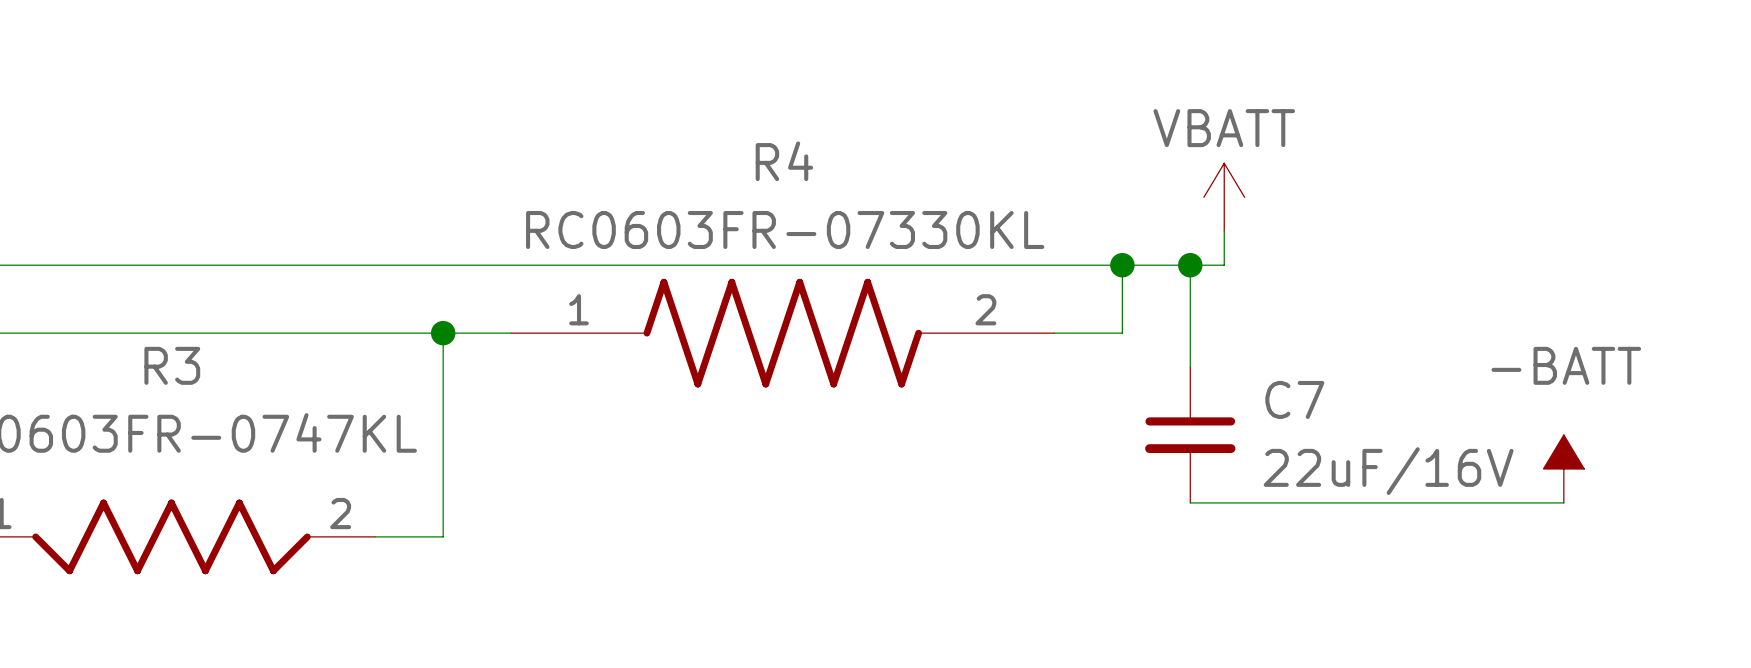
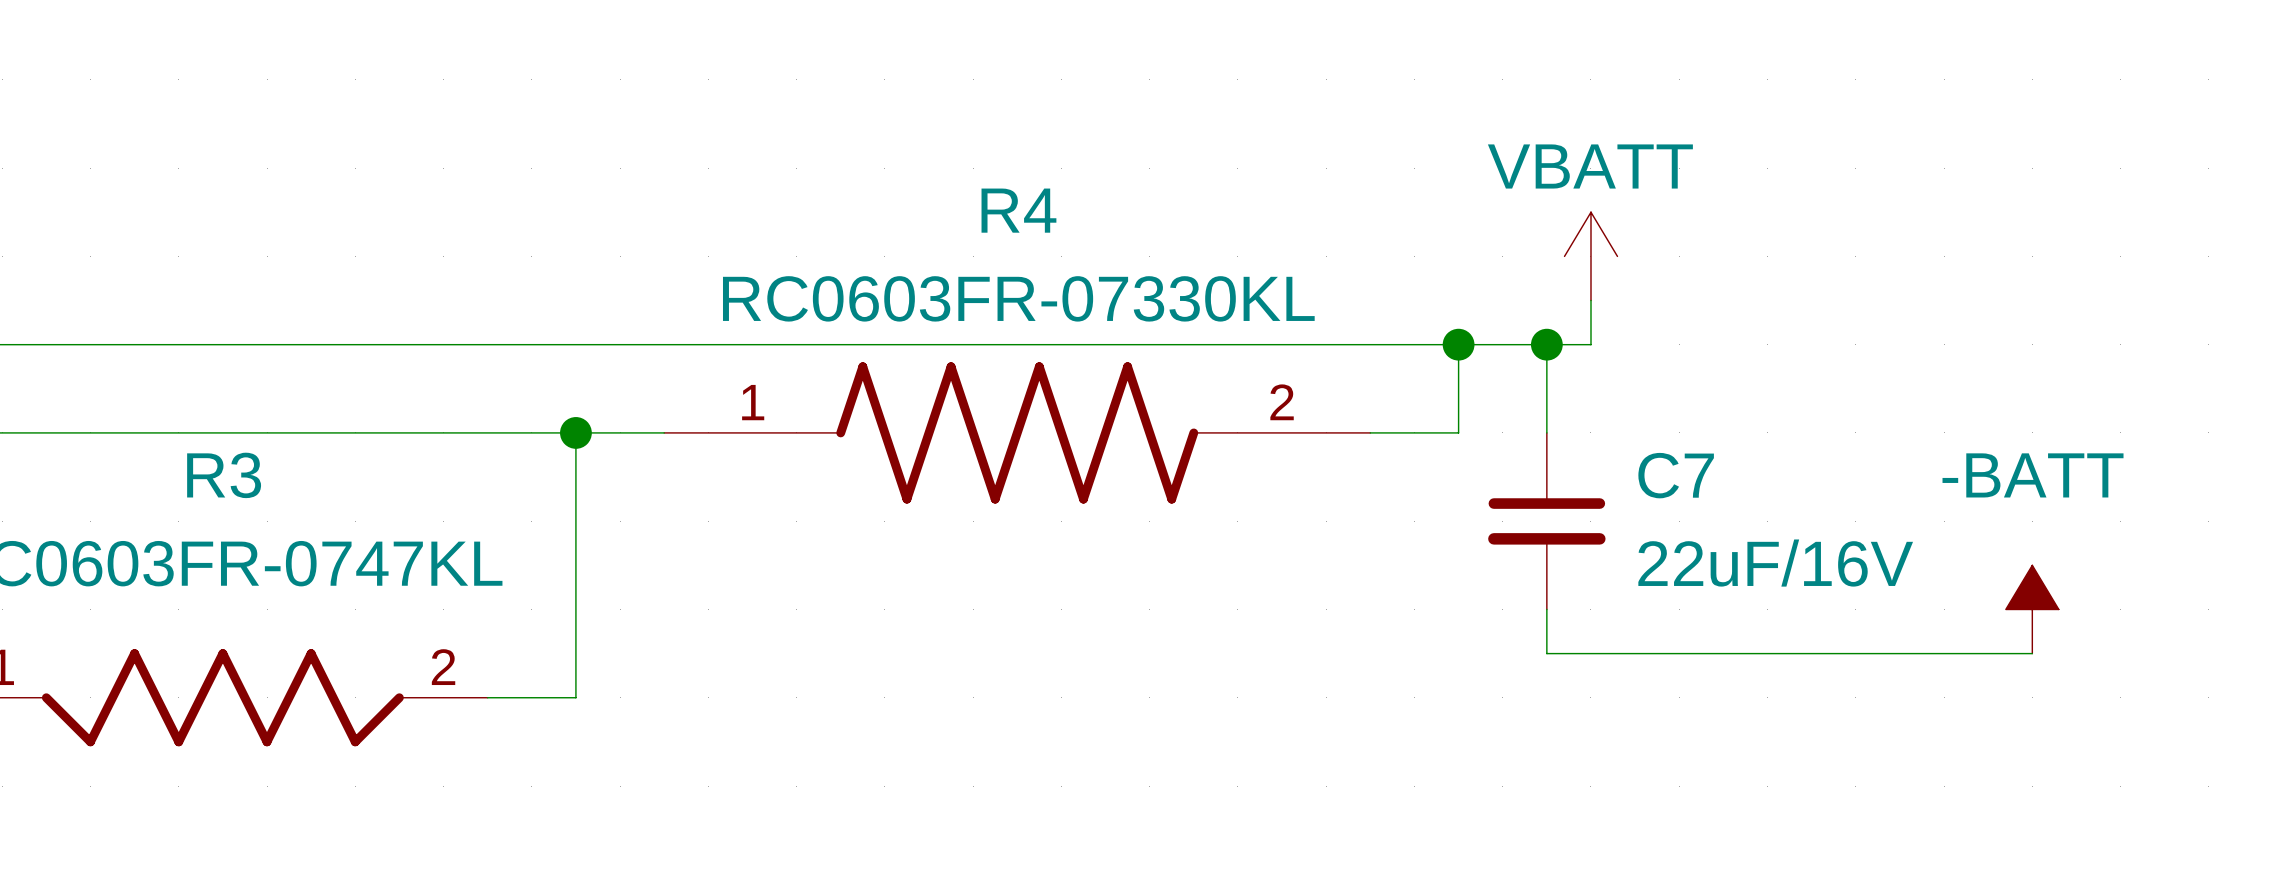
C7 position: (1190, 435) -> (1546, 521)

